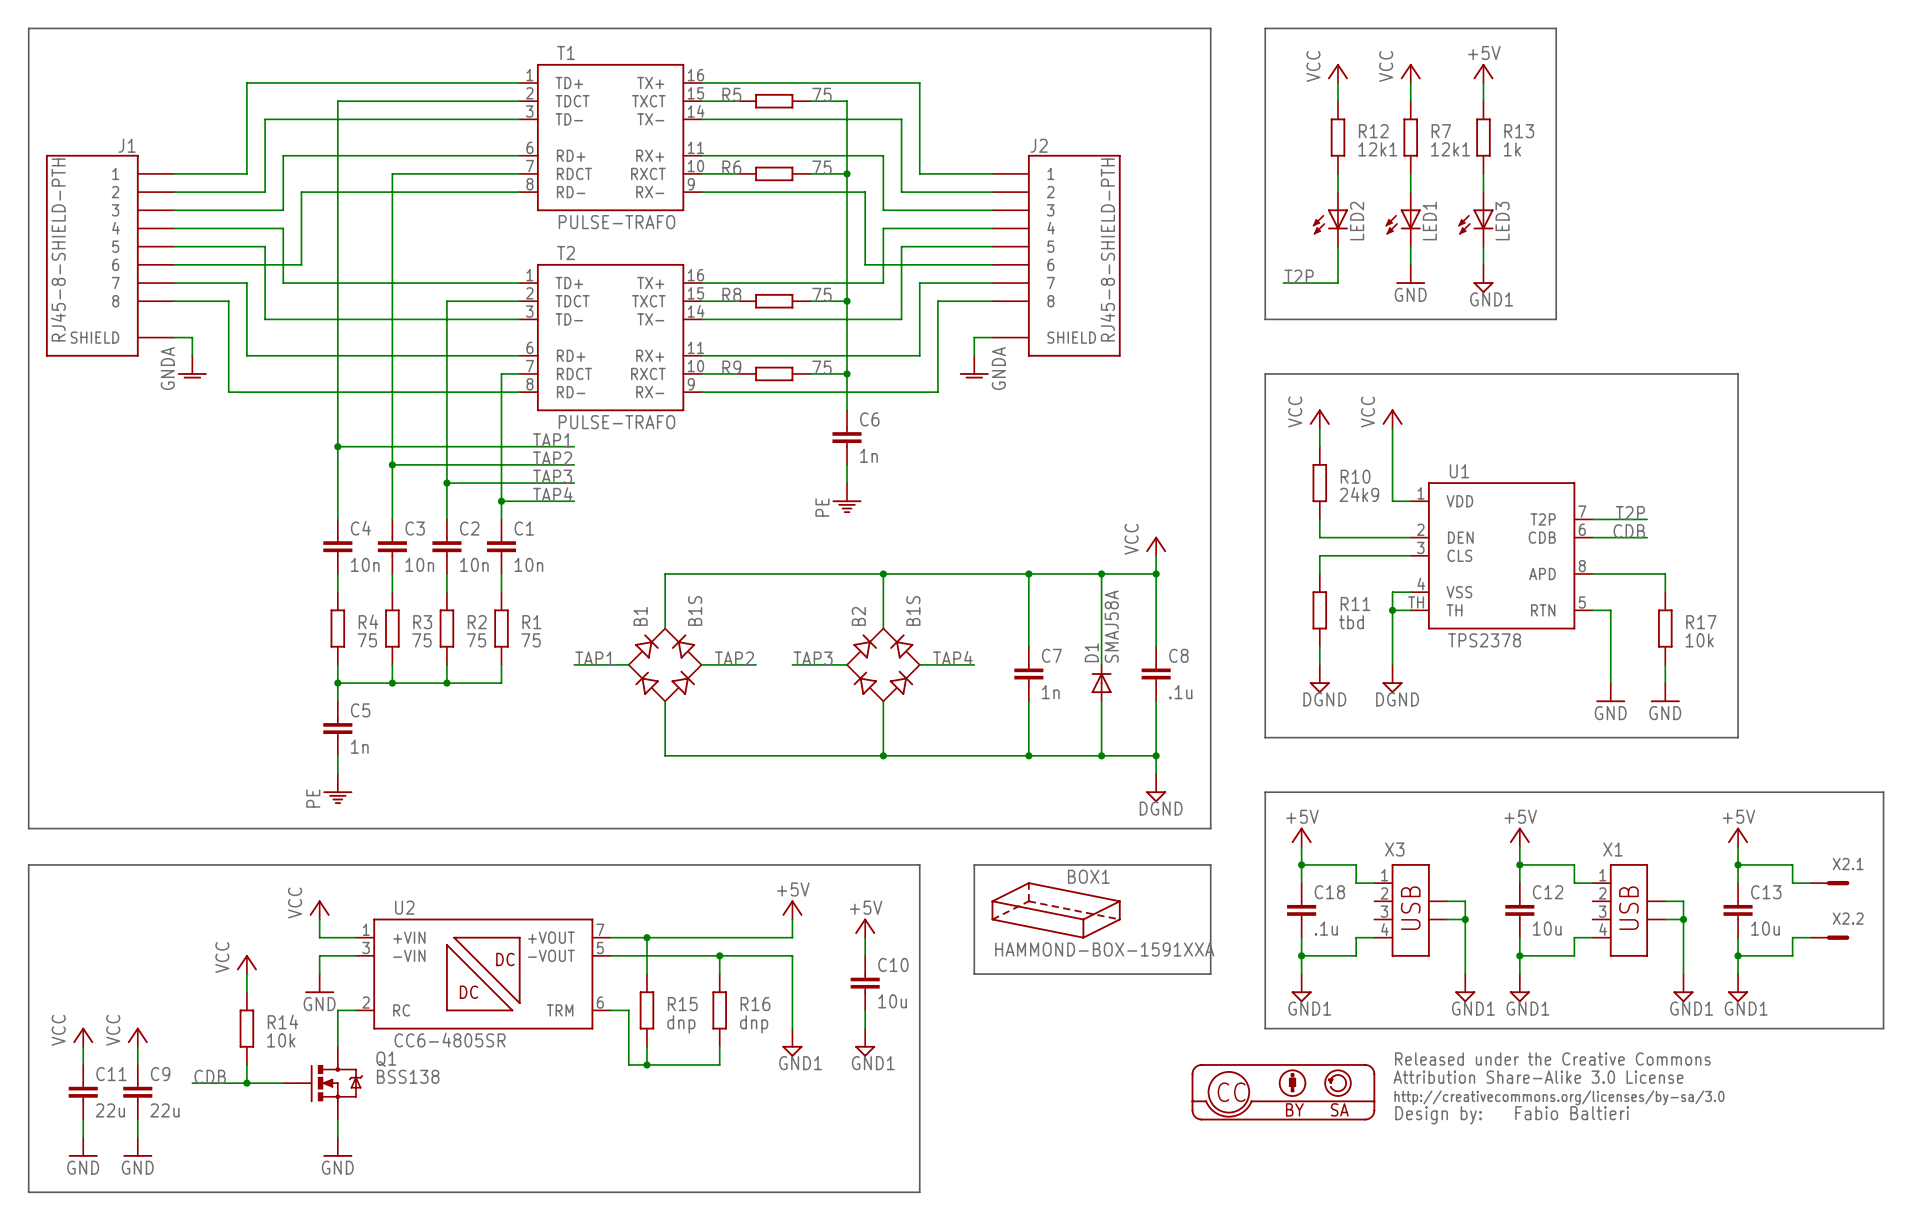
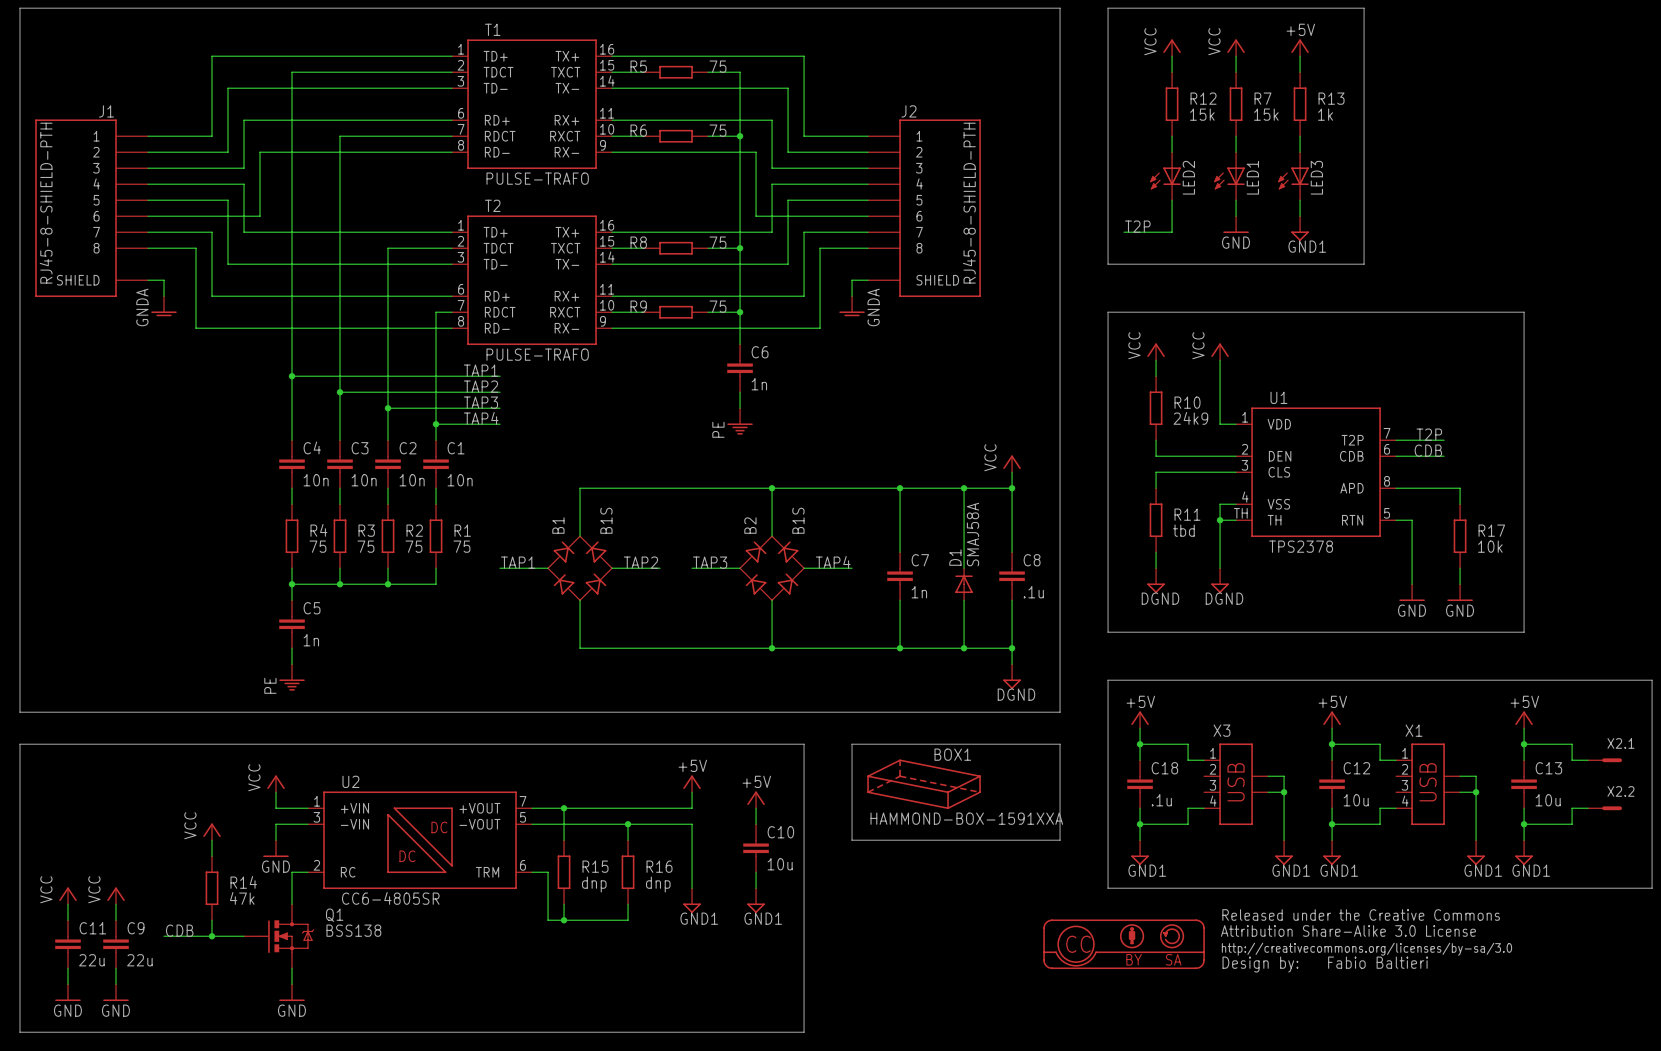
R12 value: 12k1 (1377, 149) -> 15k (1202, 114)
R7 value: 12k1 (1450, 149) -> 15k (1266, 114)
R14 value: 10k (281, 1040) -> 47k (242, 898)

